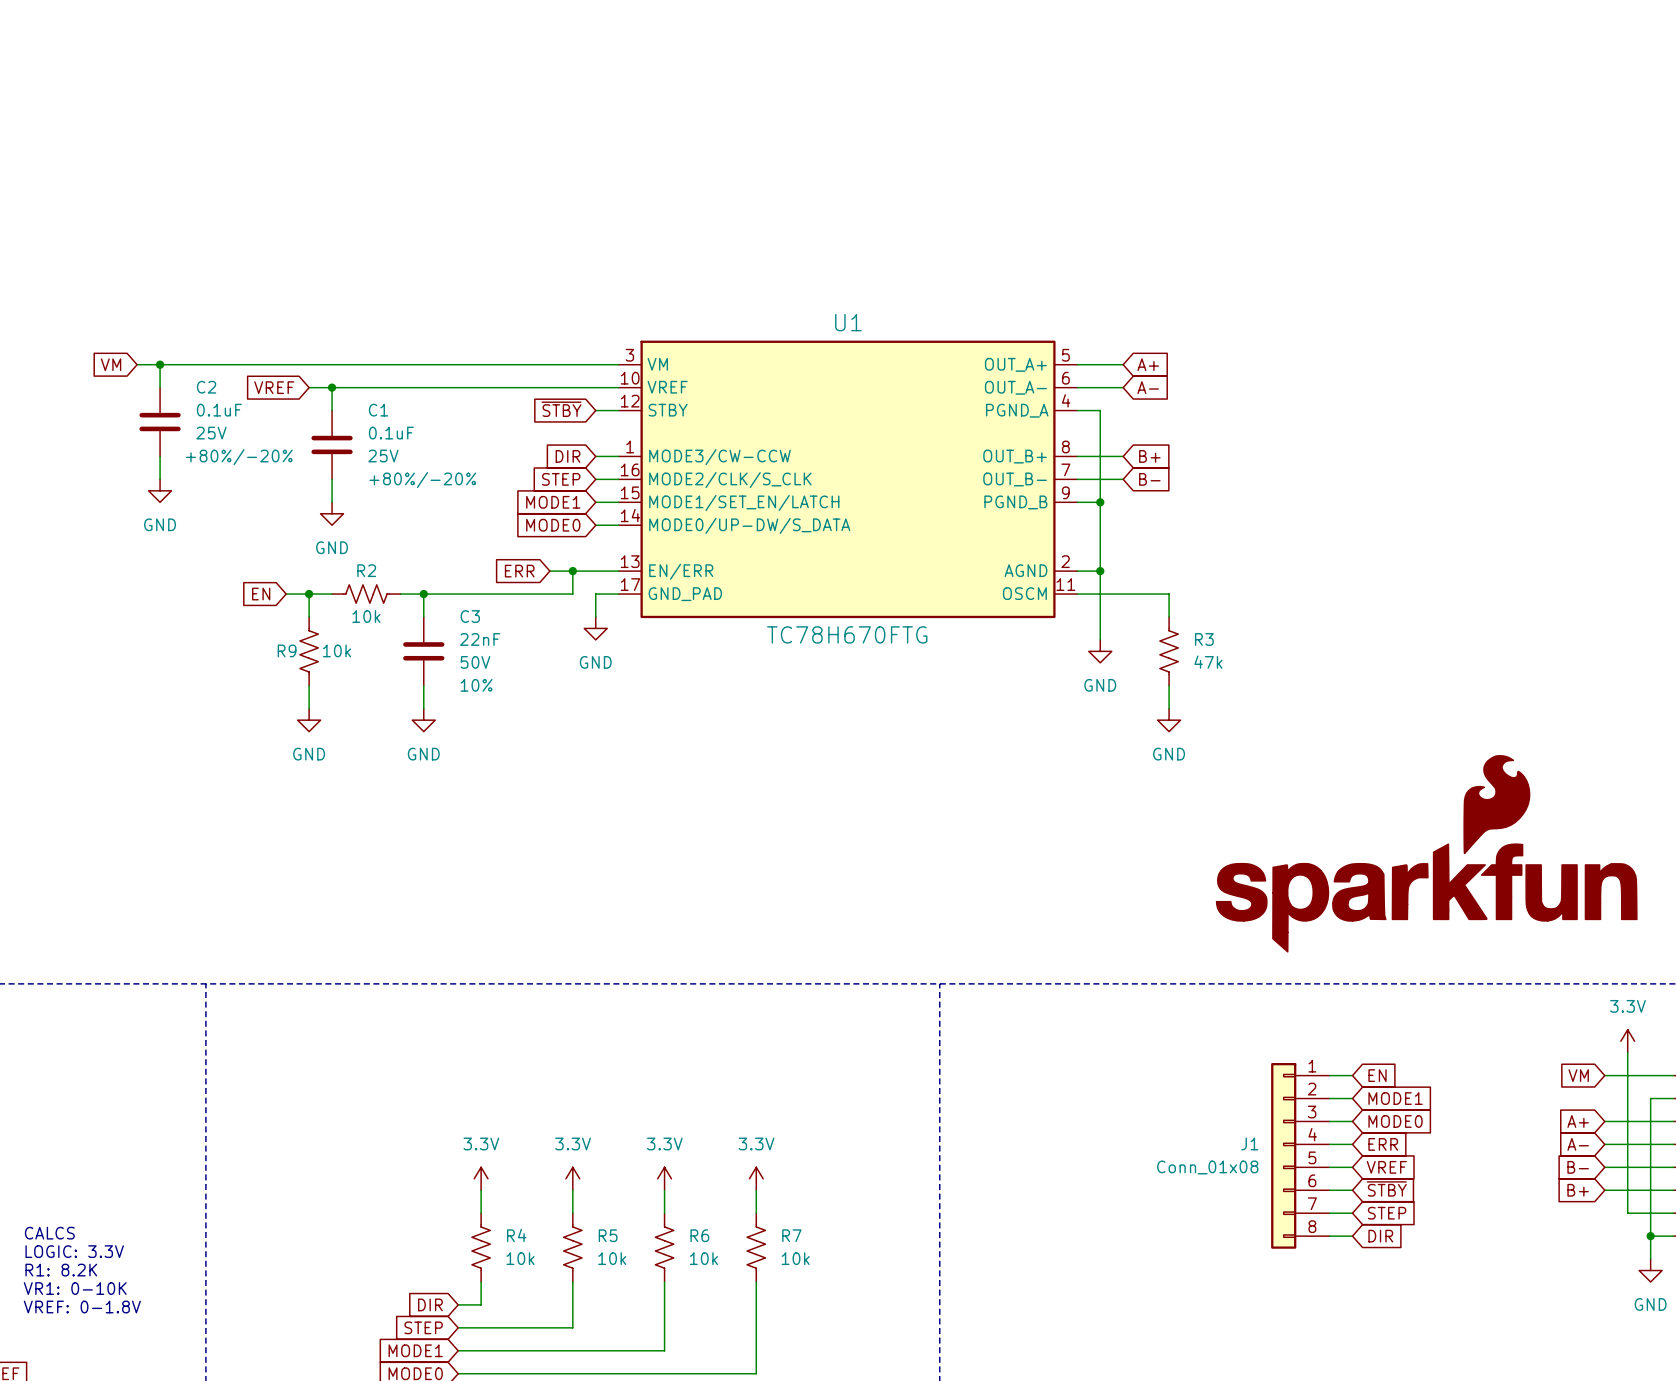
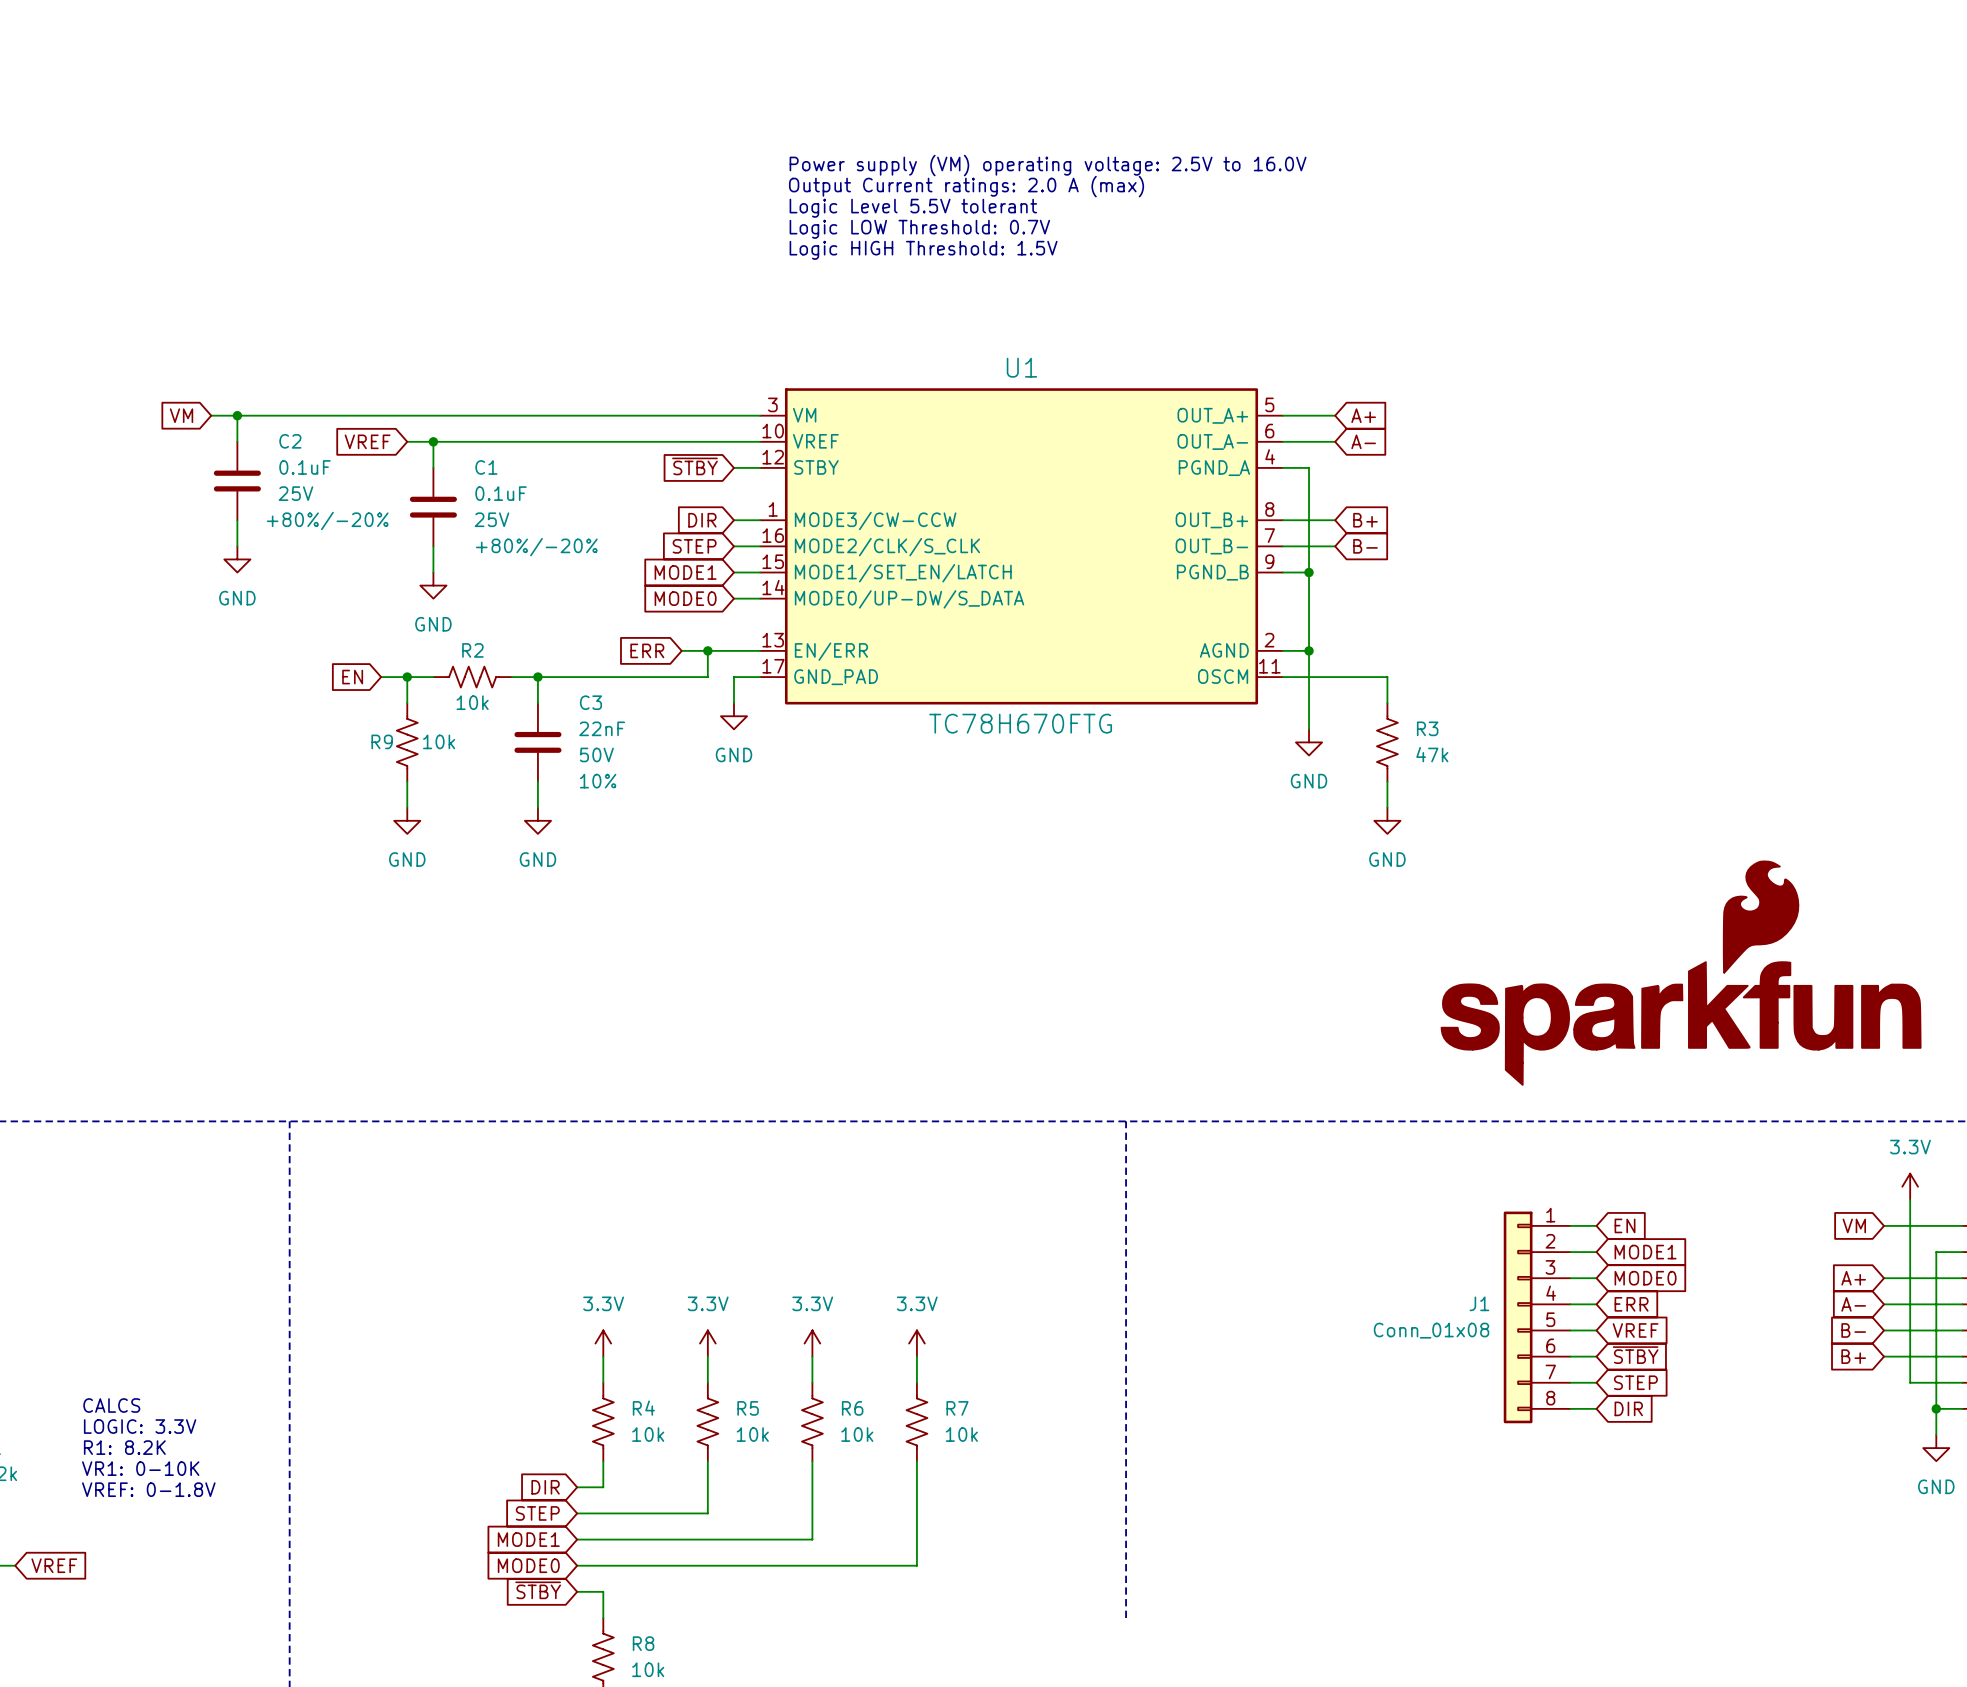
text: none -> Power supply (VM) operating voltage: 2.5V to 16.0V (1048, 165)
text: none -> Output Current ratings: 2.0 A (max) (966, 186)
text: none -> Logic Level 5.5V tolerant (913, 208)
text: none -> Logic LOW Threshold: 0.7V (919, 229)
text: none -> Logic HIGH Threshold: 1.5V (923, 250)

